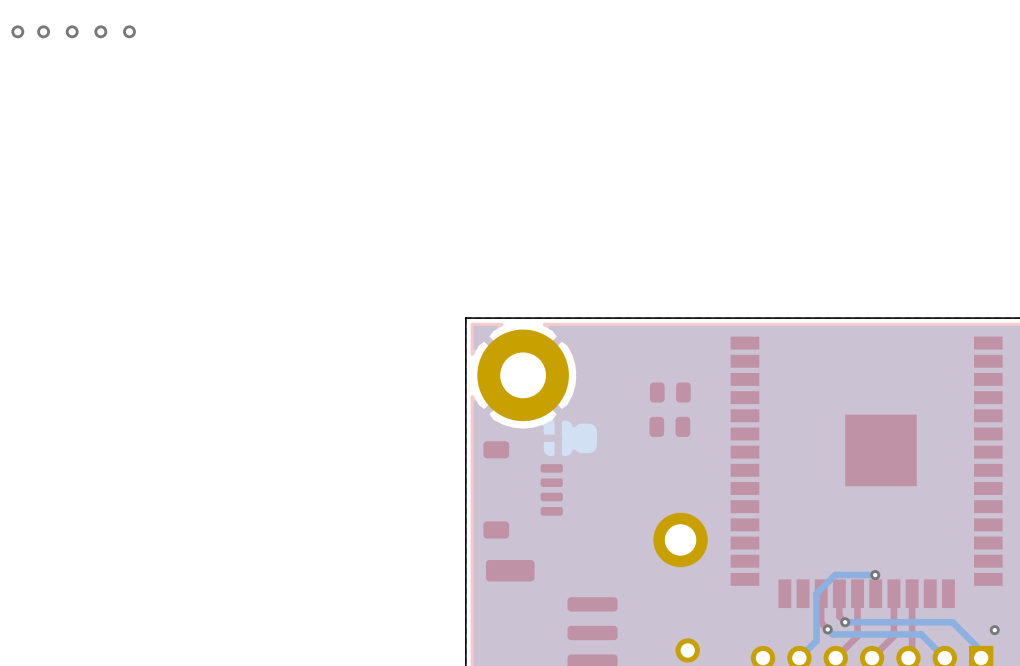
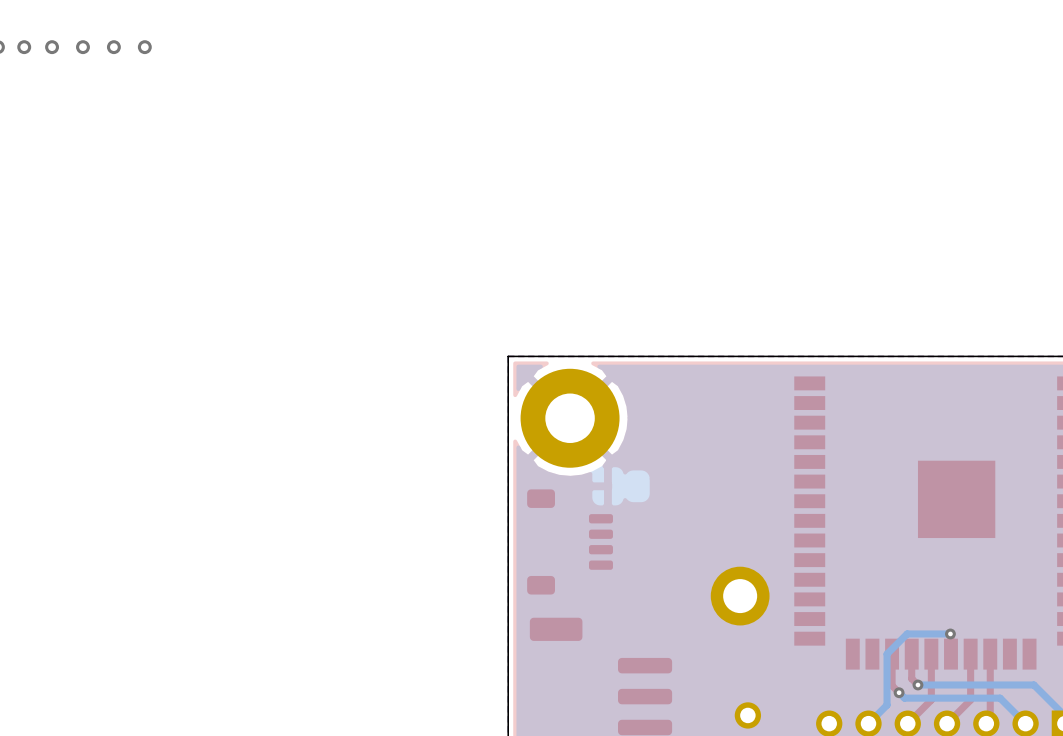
part: (670, 392) -> none
part: (669, 426) -> none

